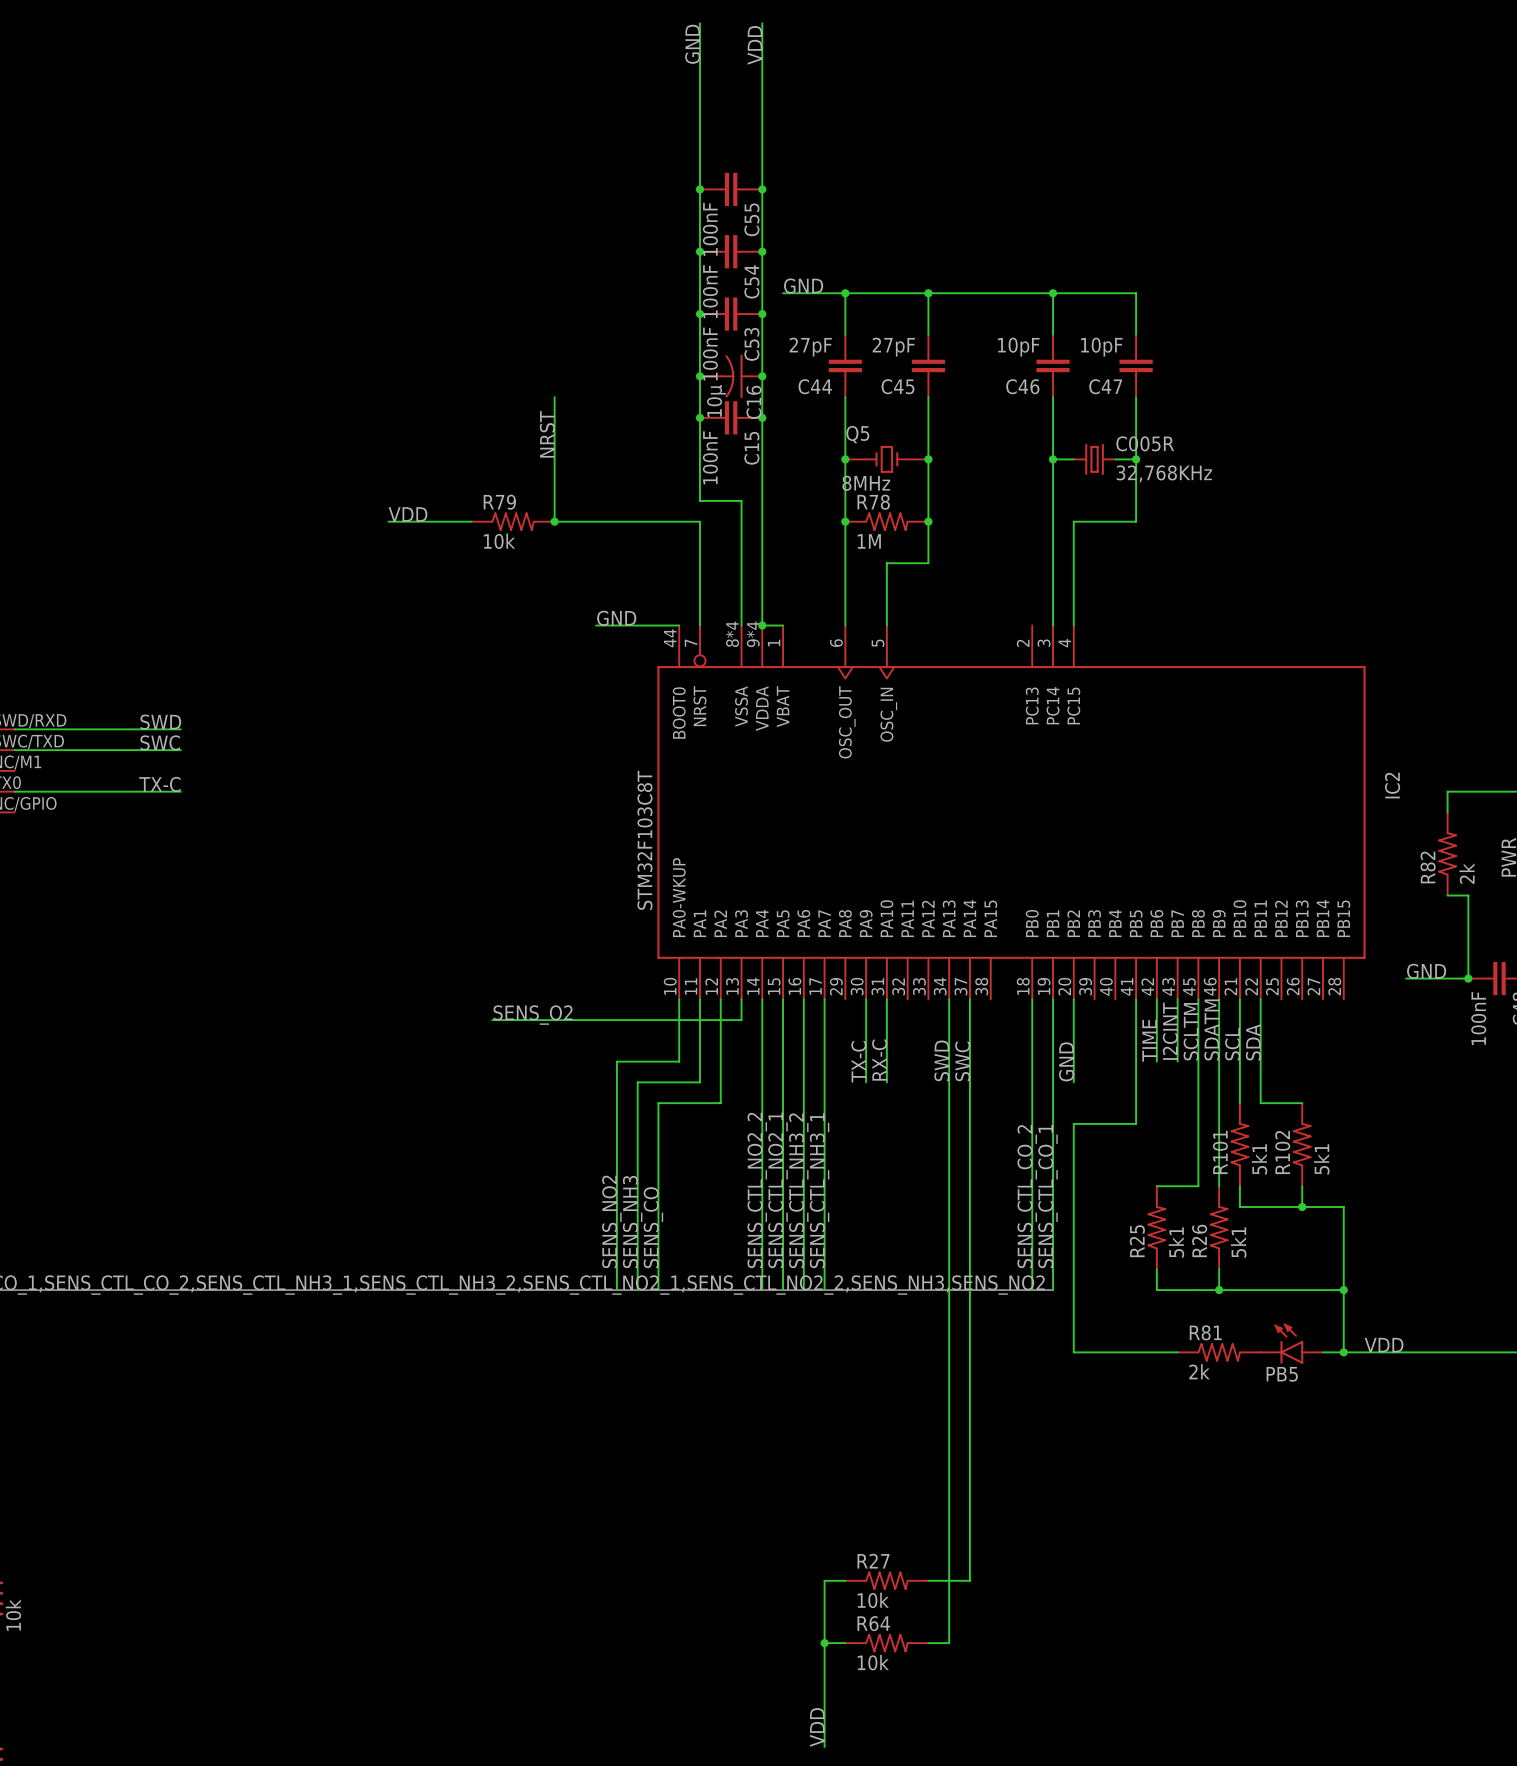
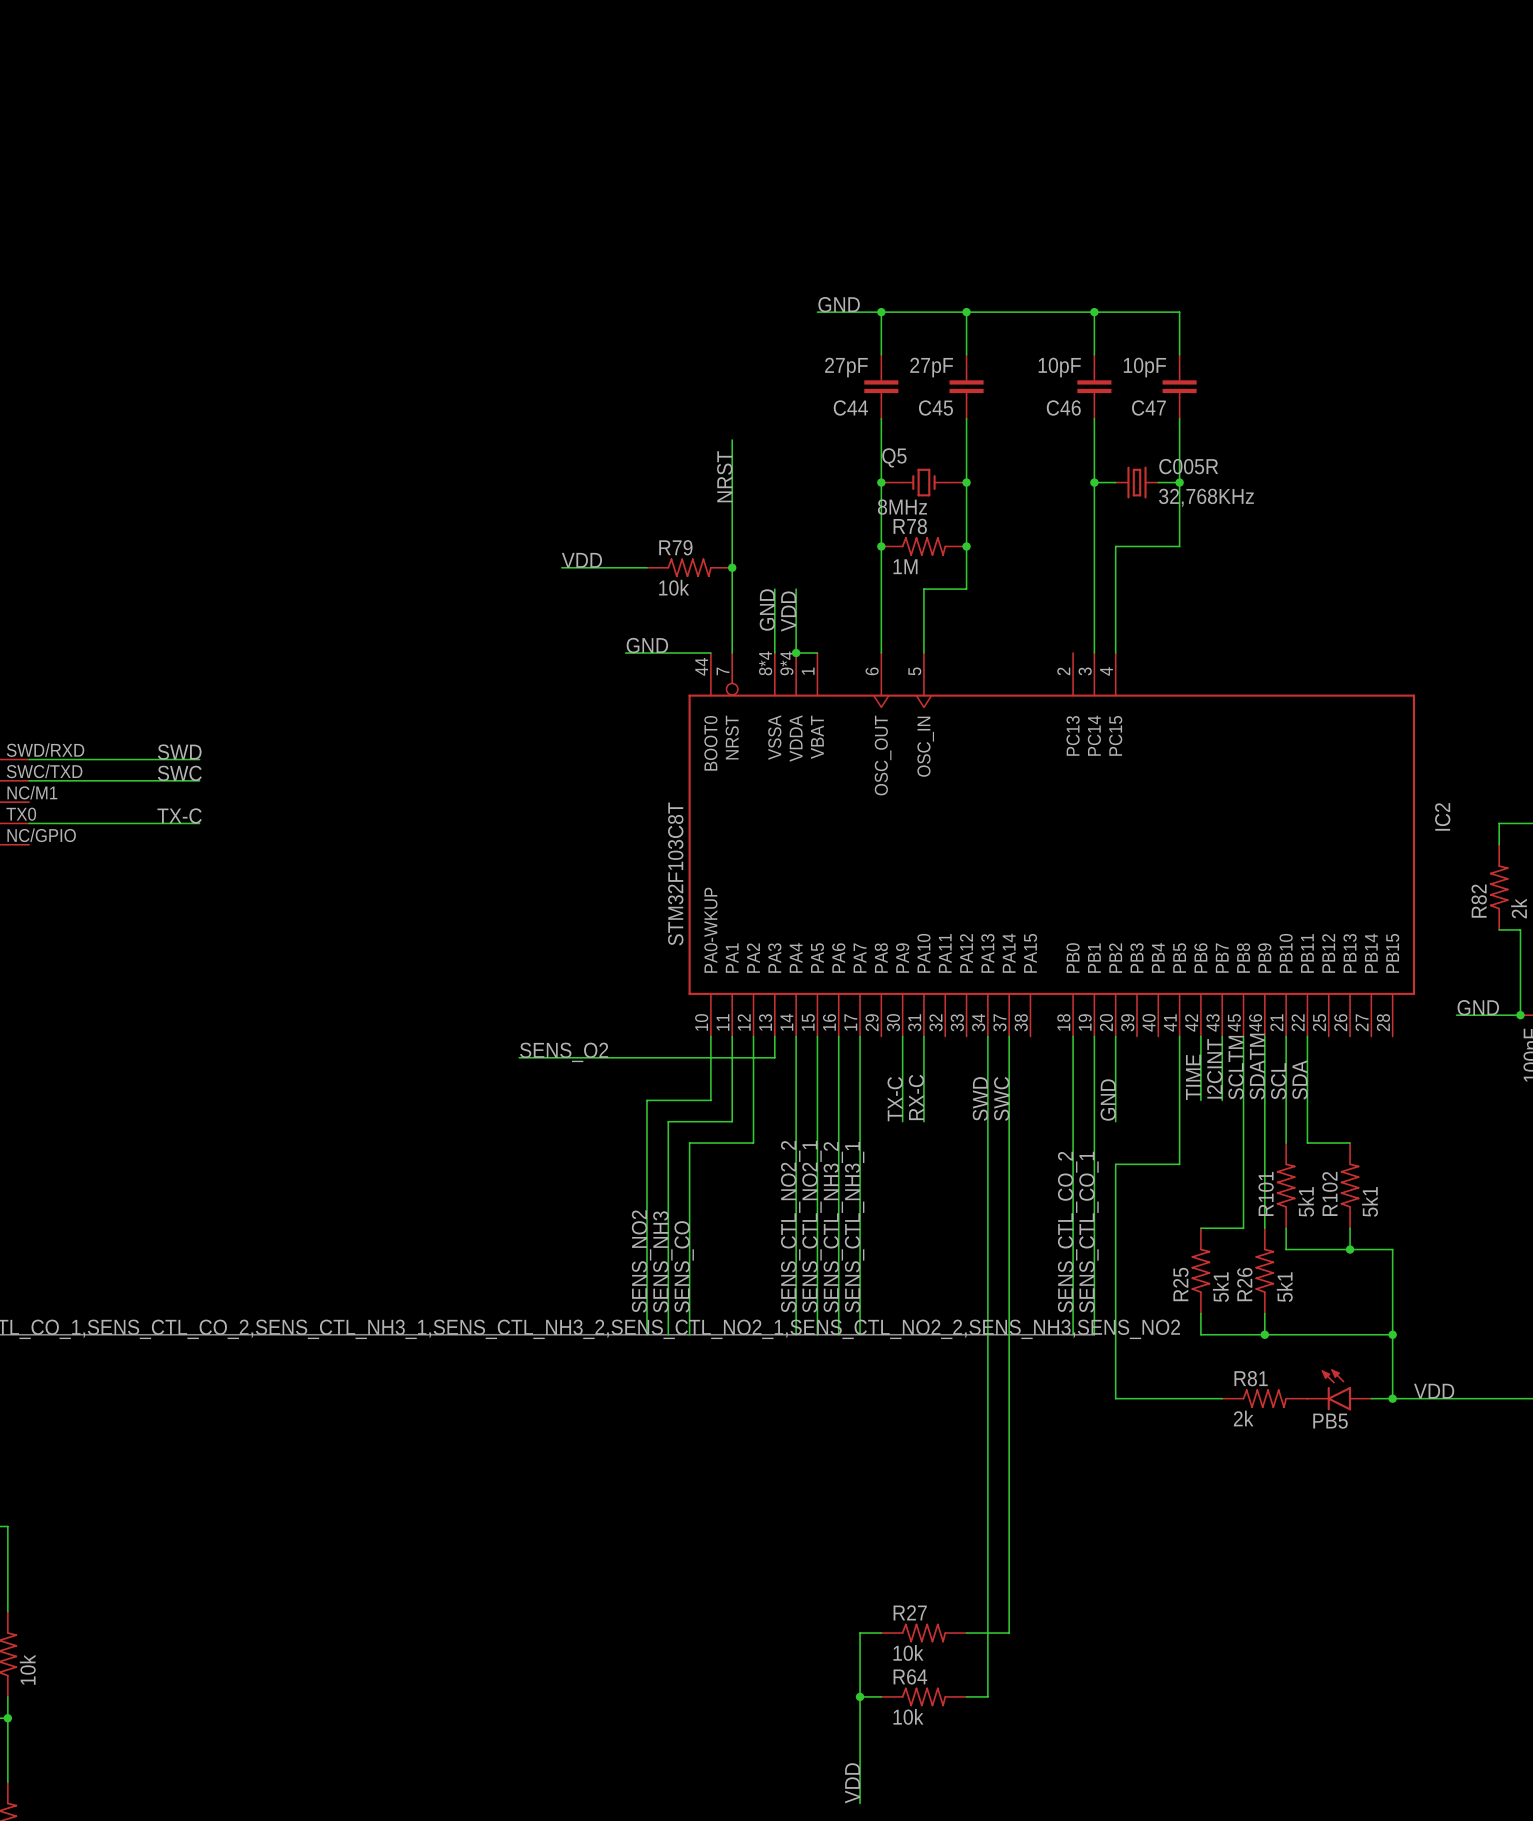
wire: (699, 23) (699, 417) -> none
wire: (762, 23) (762, 563) -> none
label: GND (692, 44) -> none
label: VDD (755, 45) -> none
junction: (699, 189) -> none
C55: 100nF (731, 189) -> none
junction: (762, 189) -> none
junction: (699, 251) -> none
C54: 100nF (731, 251) -> none
junction: (762, 251) -> none
junction: (699, 314) -> none
C53: 100nF (731, 314) -> none
junction: (762, 314) -> none
junction: (699, 376) -> none
C16: 10µ (731, 376) -> none
junction: (762, 376) -> none
wire: (554, 397) (554, 521) (699, 521) -> none
junction: (699, 417) -> none
C15: 100nF (731, 417) -> none
junction: (762, 417) -> none
label position: NRST (547, 434) -> NRST (724, 476)
wire: (699, 500) (741, 500) (741, 563) -> (732, 525) (732, 546)
label position: VDD (407, 514) -> VDD (581, 560)
wire: (388, 521) (471, 521) -> (561, 567) (646, 567)
R79 position: (513, 521) -> (689, 567)
junction: (554, 521) -> none
junction: none -> (732, 567)
label: none -> GND (767, 610)
label: none -> VDD (788, 611)

